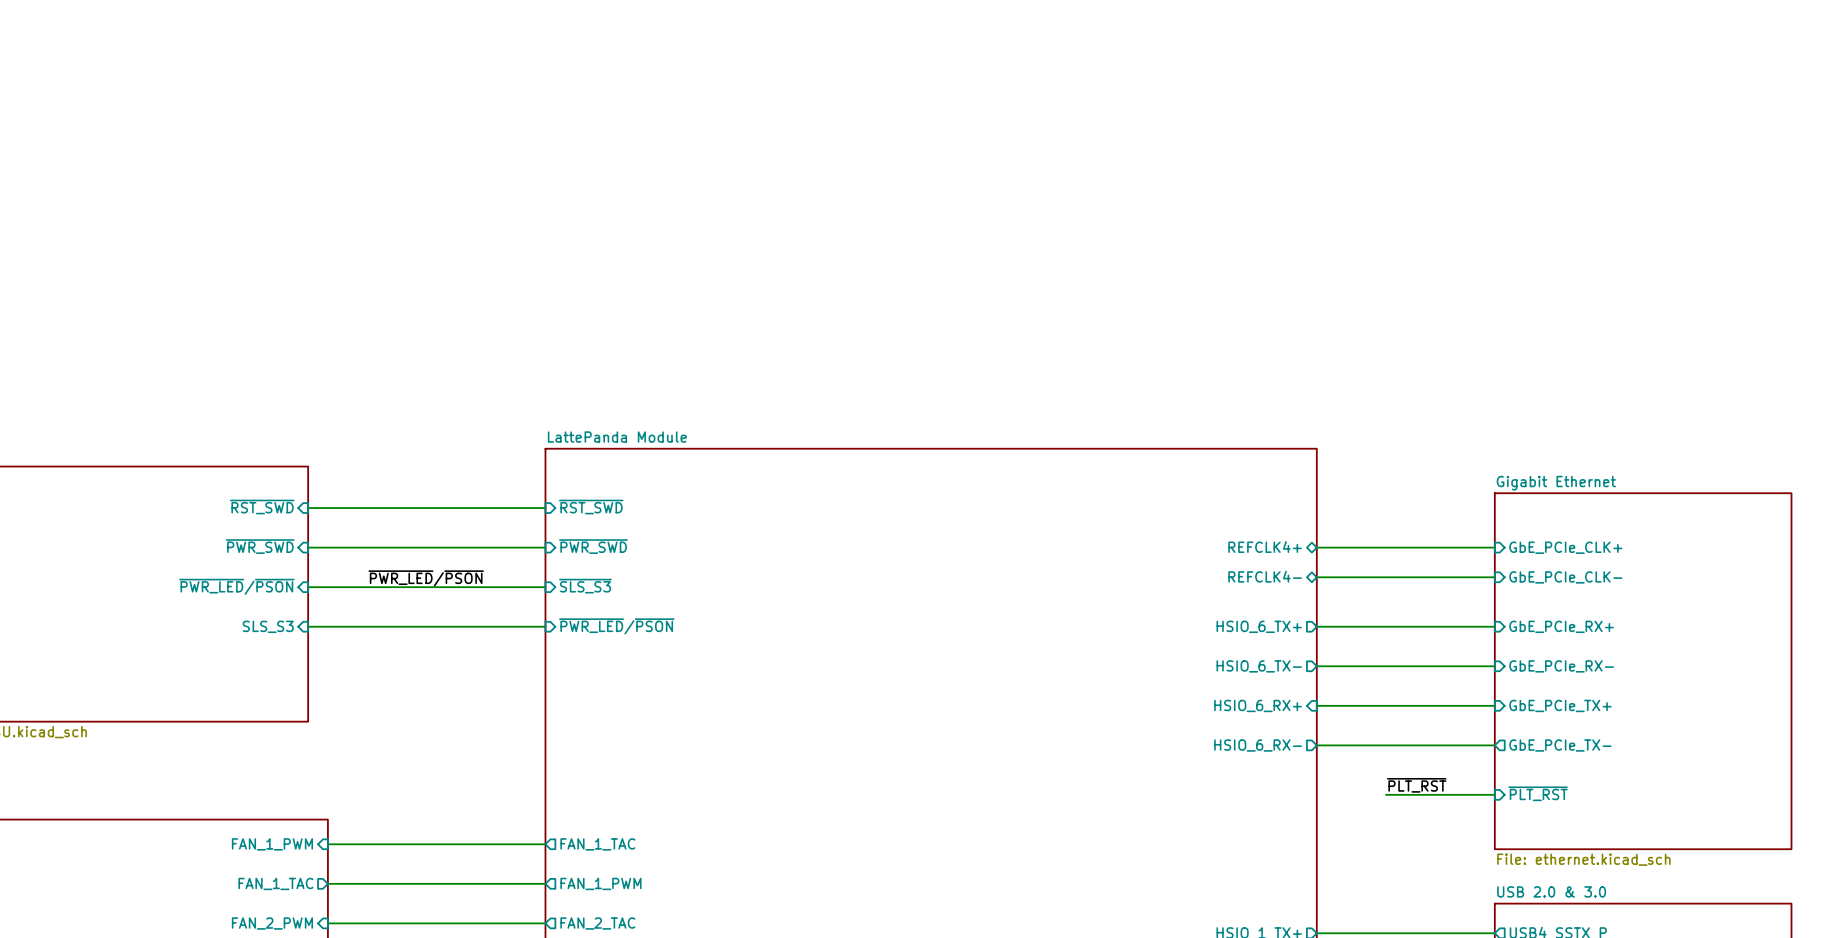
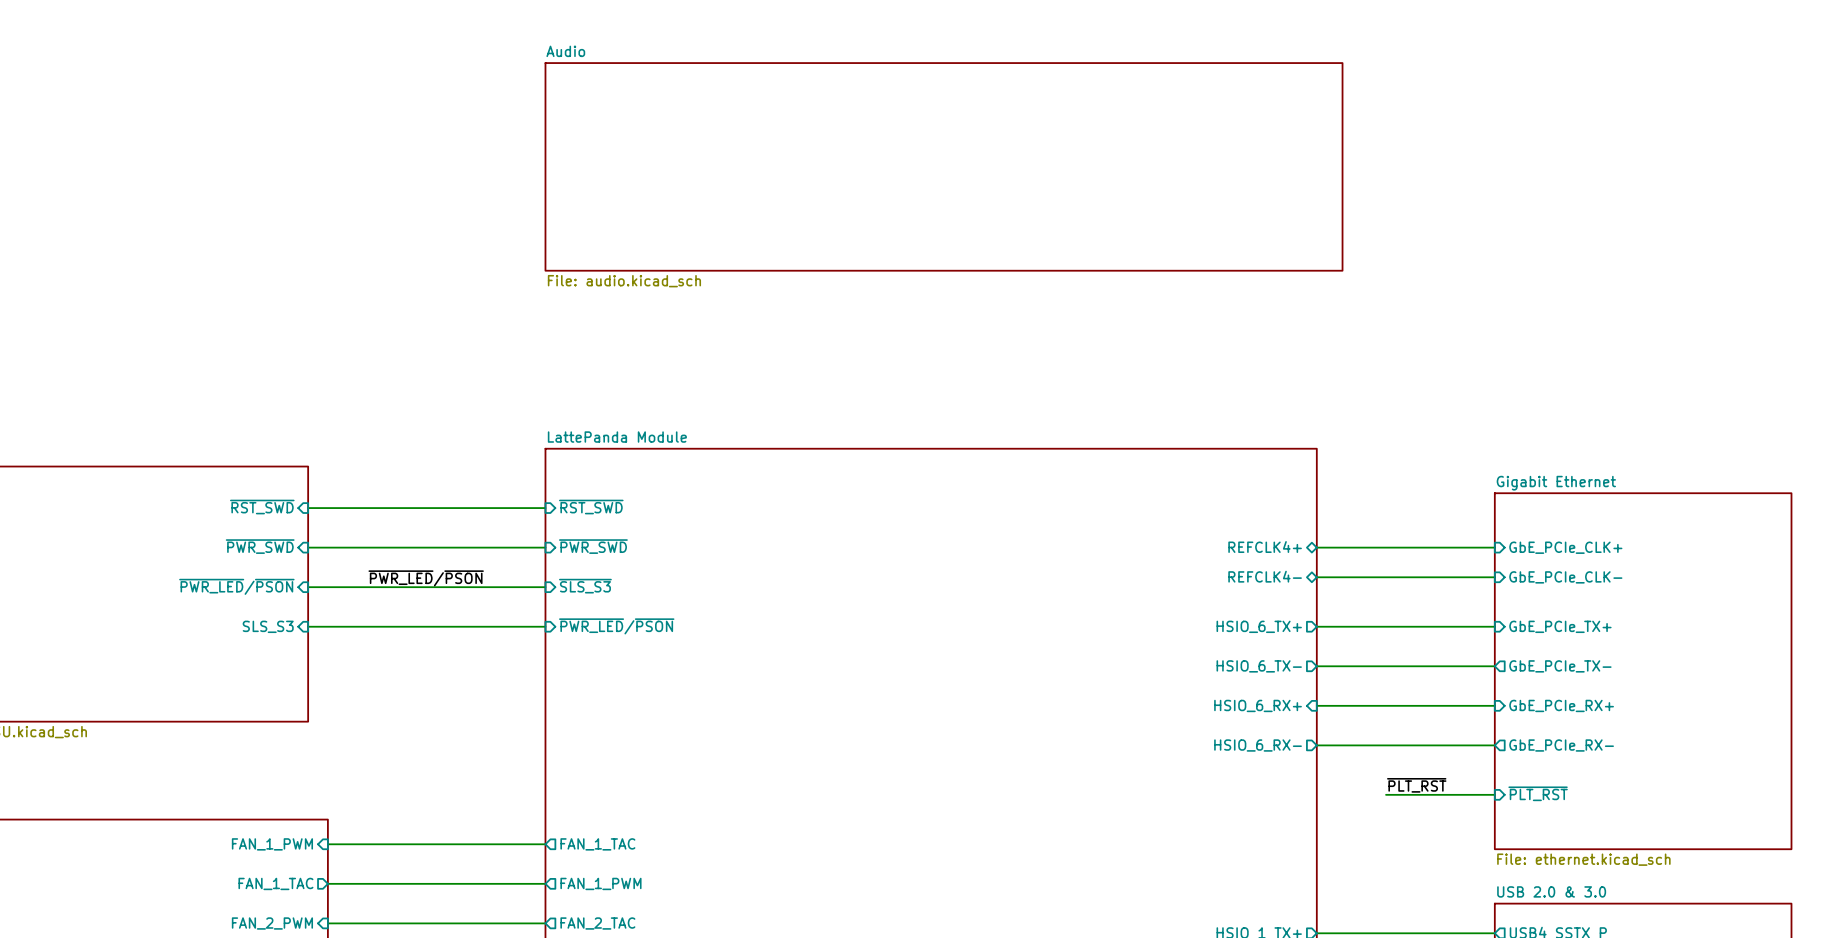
sheet Audio: none -> File: audio.kicad_sch (944, 166)
sheet pin: GbE_PCIe_RX+ (1561, 626) -> GbE_PCIe_TX+ (1560, 626)
sheet pin shape: input (1561, 666) -> output (1560, 666)
sheet pin: GbE_PCIe_RX- (1561, 666) -> GbE_PCIe_TX- (1560, 666)
sheet pin: GbE_PCIe_TX+ (1560, 705) -> GbE_PCIe_RX+ (1561, 705)
sheet pin: GbE_PCIe_TX- (1560, 745) -> GbE_PCIe_RX- (1561, 745)

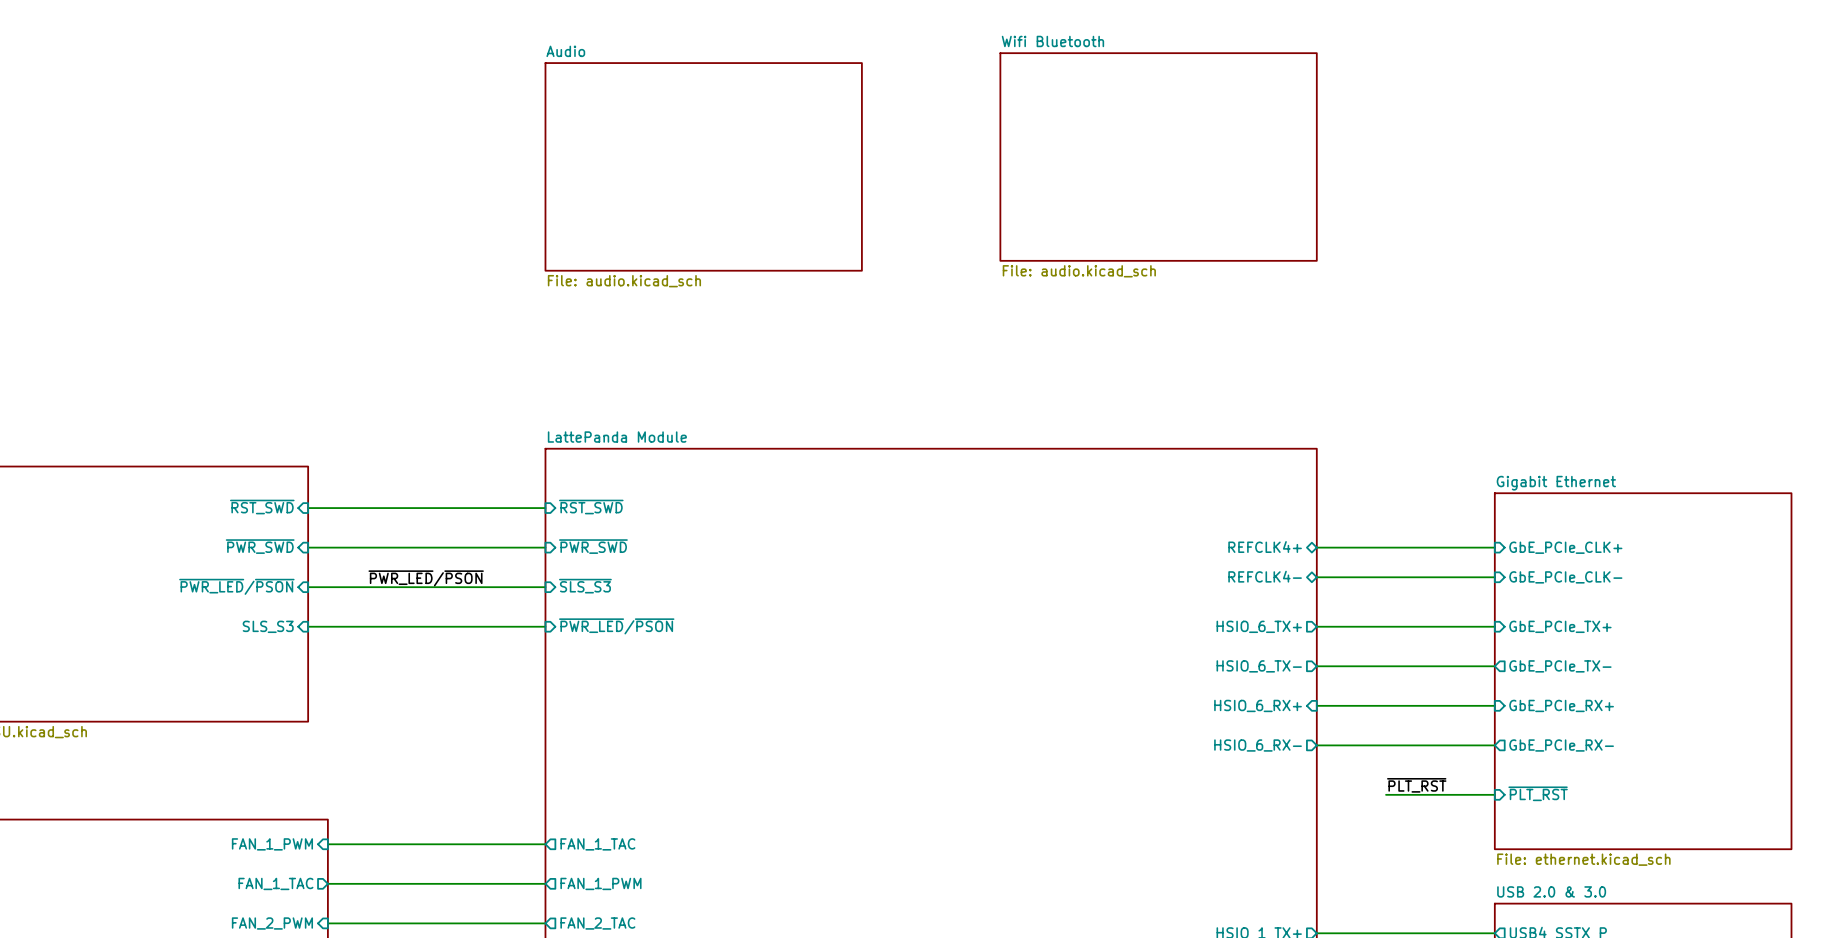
sheet Wifi Bluetooth: none -> File: audio.kicad_sch (1158, 157)
sheet Audio: none -> File: audio.kicad_sch (703, 166)
sheet Audio: File: audio.kicad_sch (944, 166) -> none

